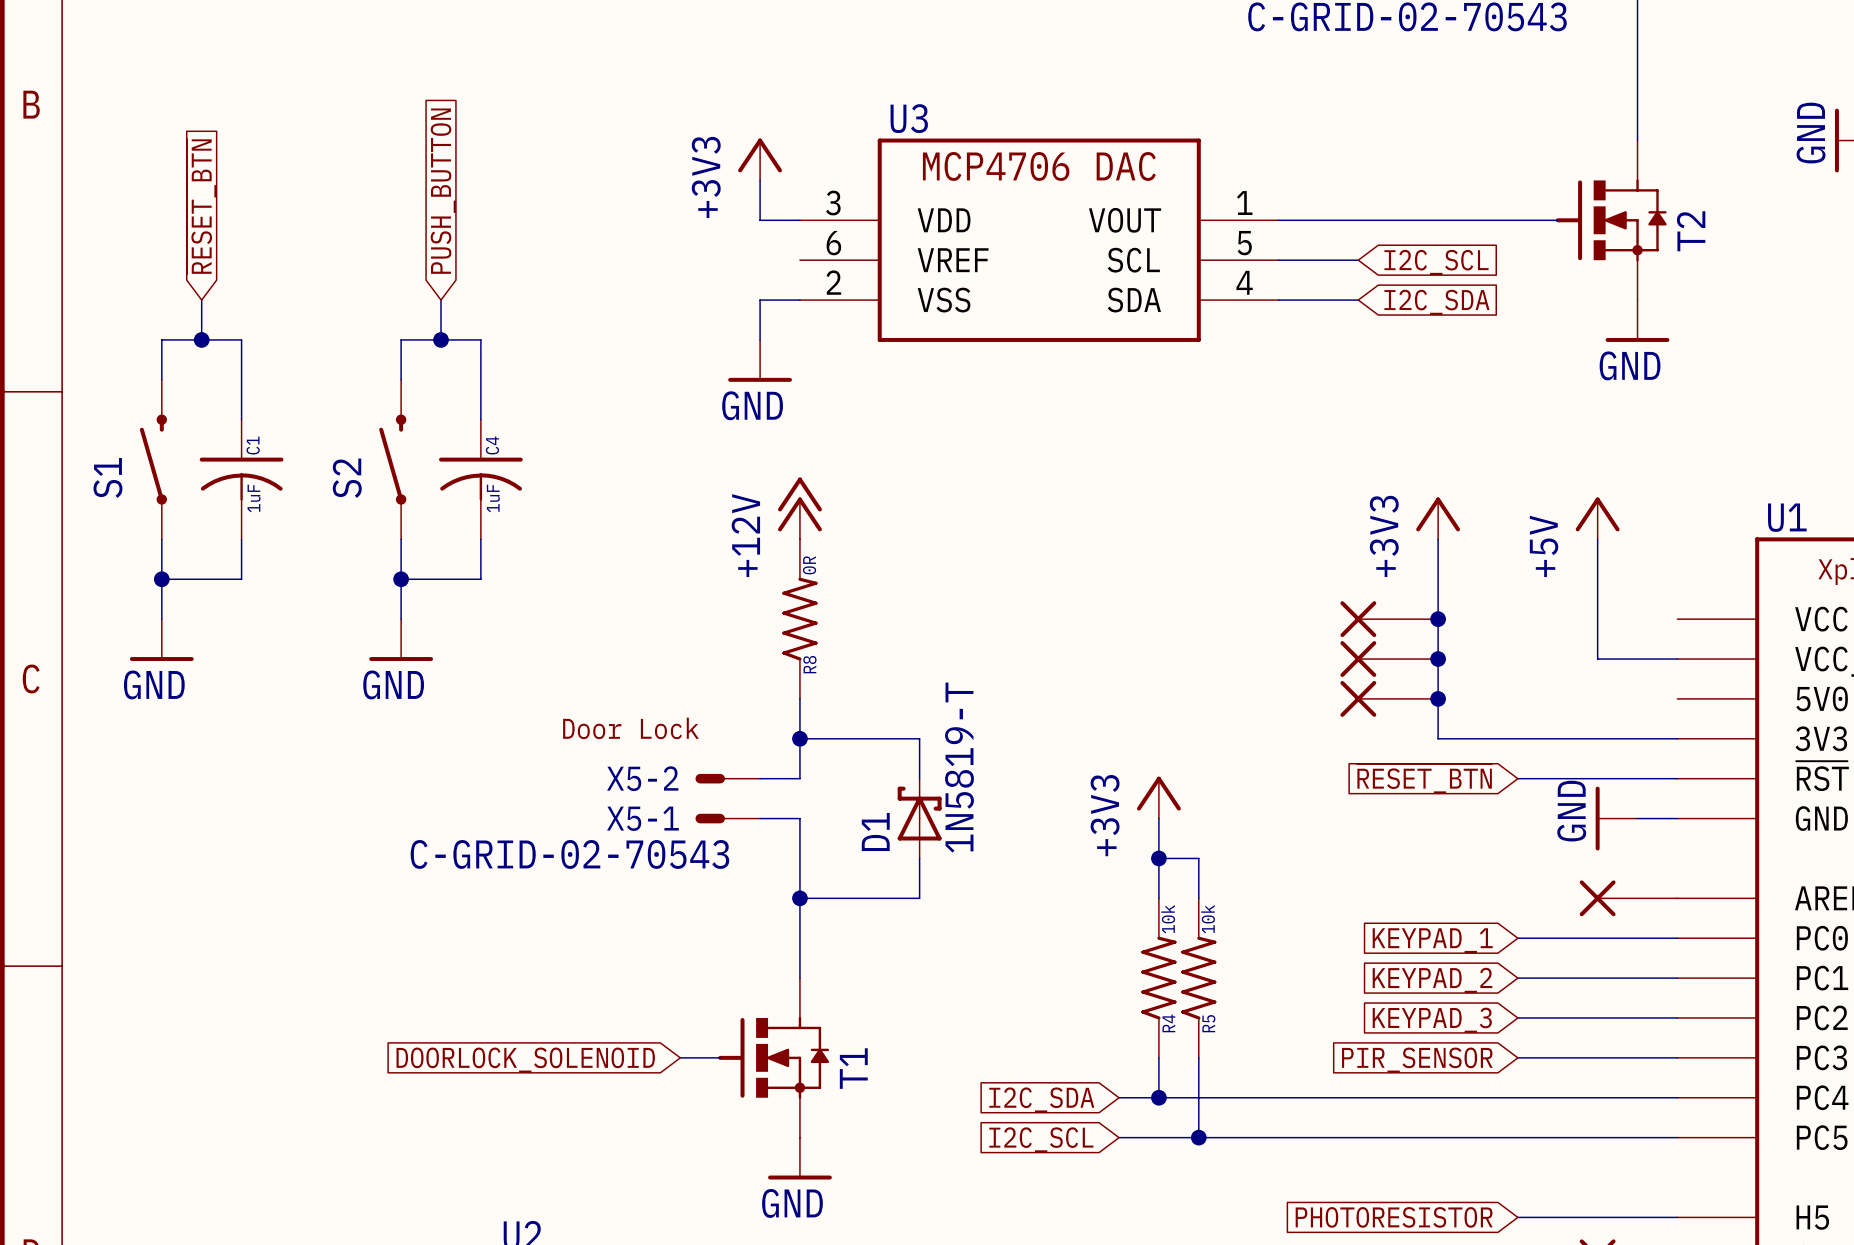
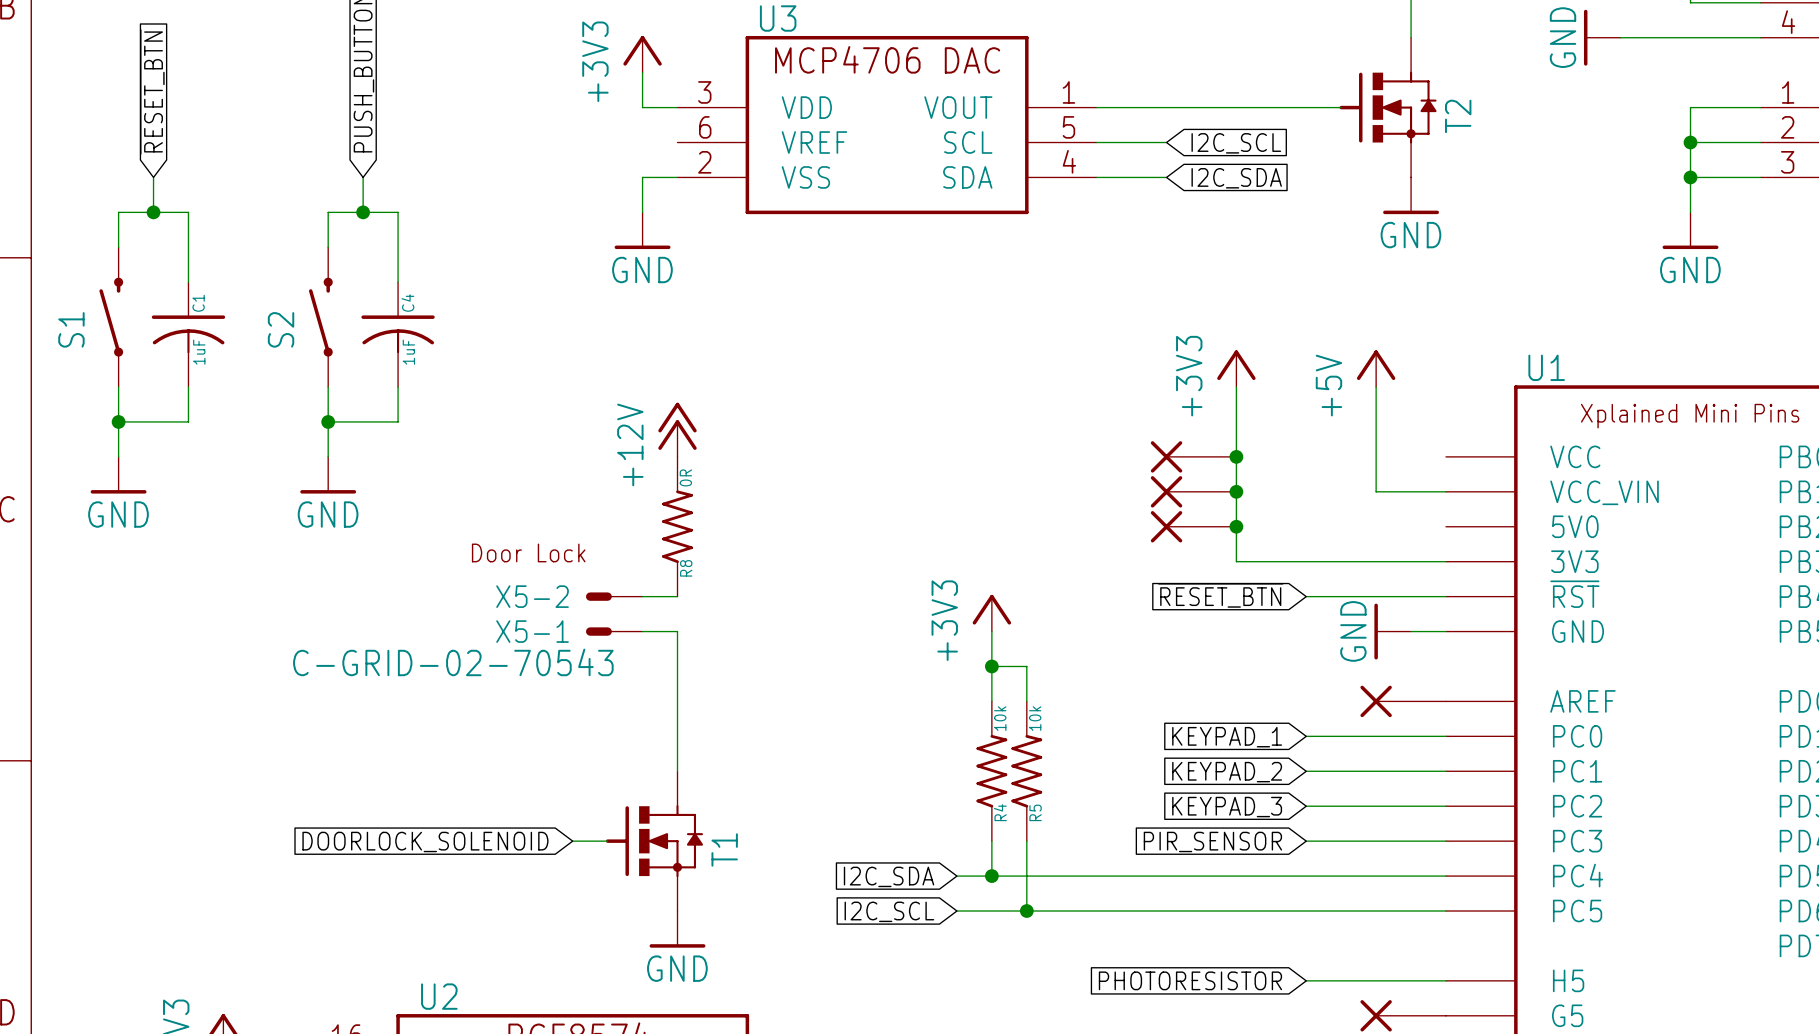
power symbol position: +12V (799, 508) -> +12V (677, 429)
R8 position: (799, 619) -> (677, 526)
wire: (799, 738) (919, 738) (919, 778) -> none
junction: (799, 738) -> none
D1: 1N5819-T (919, 818) -> none
wire: (919, 858) (919, 898) (799, 898) -> none
junction: (799, 898) -> none

